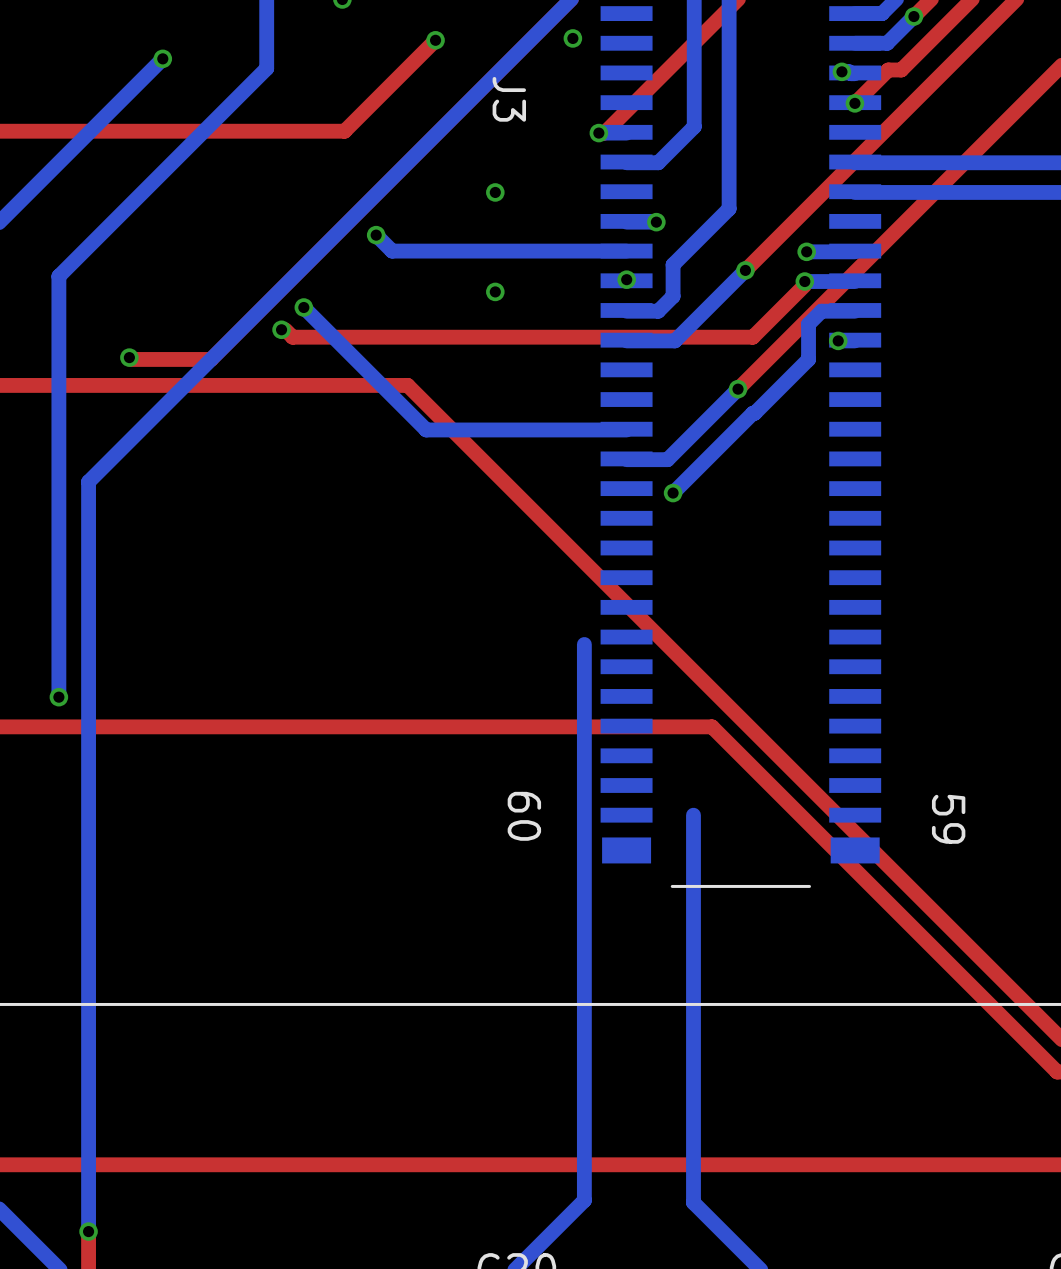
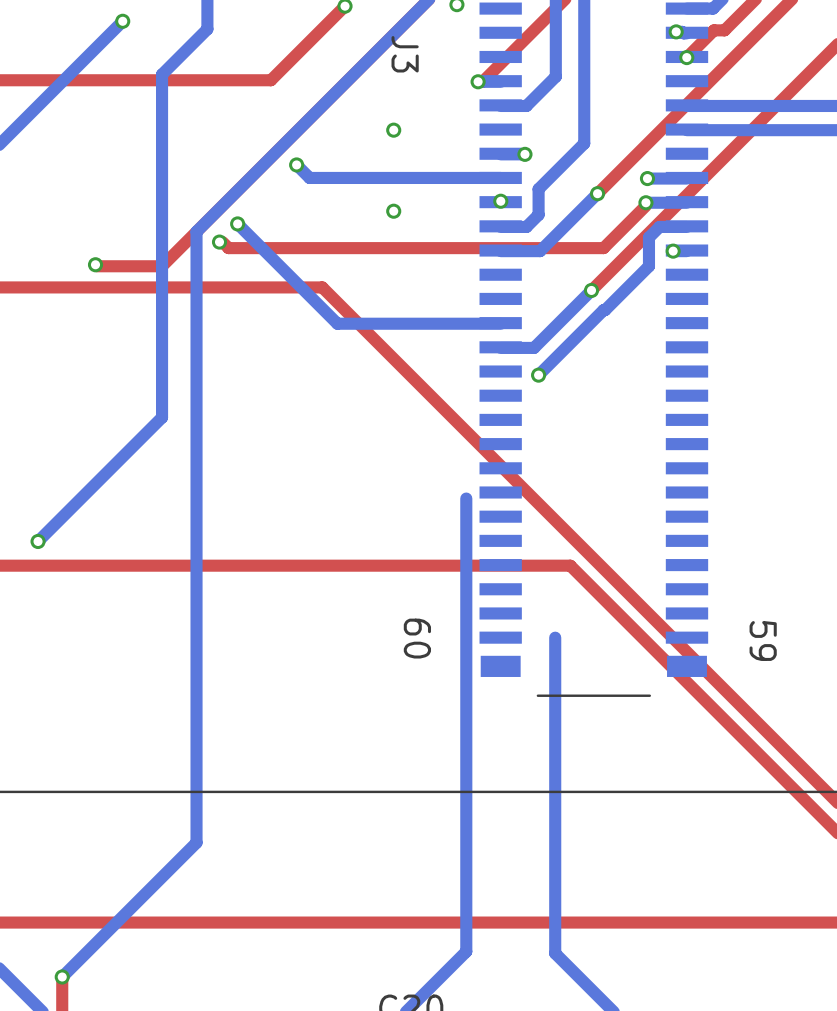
bottom track: (211, 124) (58, 276) (58, 697) -> (162, 74) (162, 417) (38, 541)
bottom track: (253, 317) (88, 481) (88, 1231) -> (196, 231) (196, 842) (62, 977)

